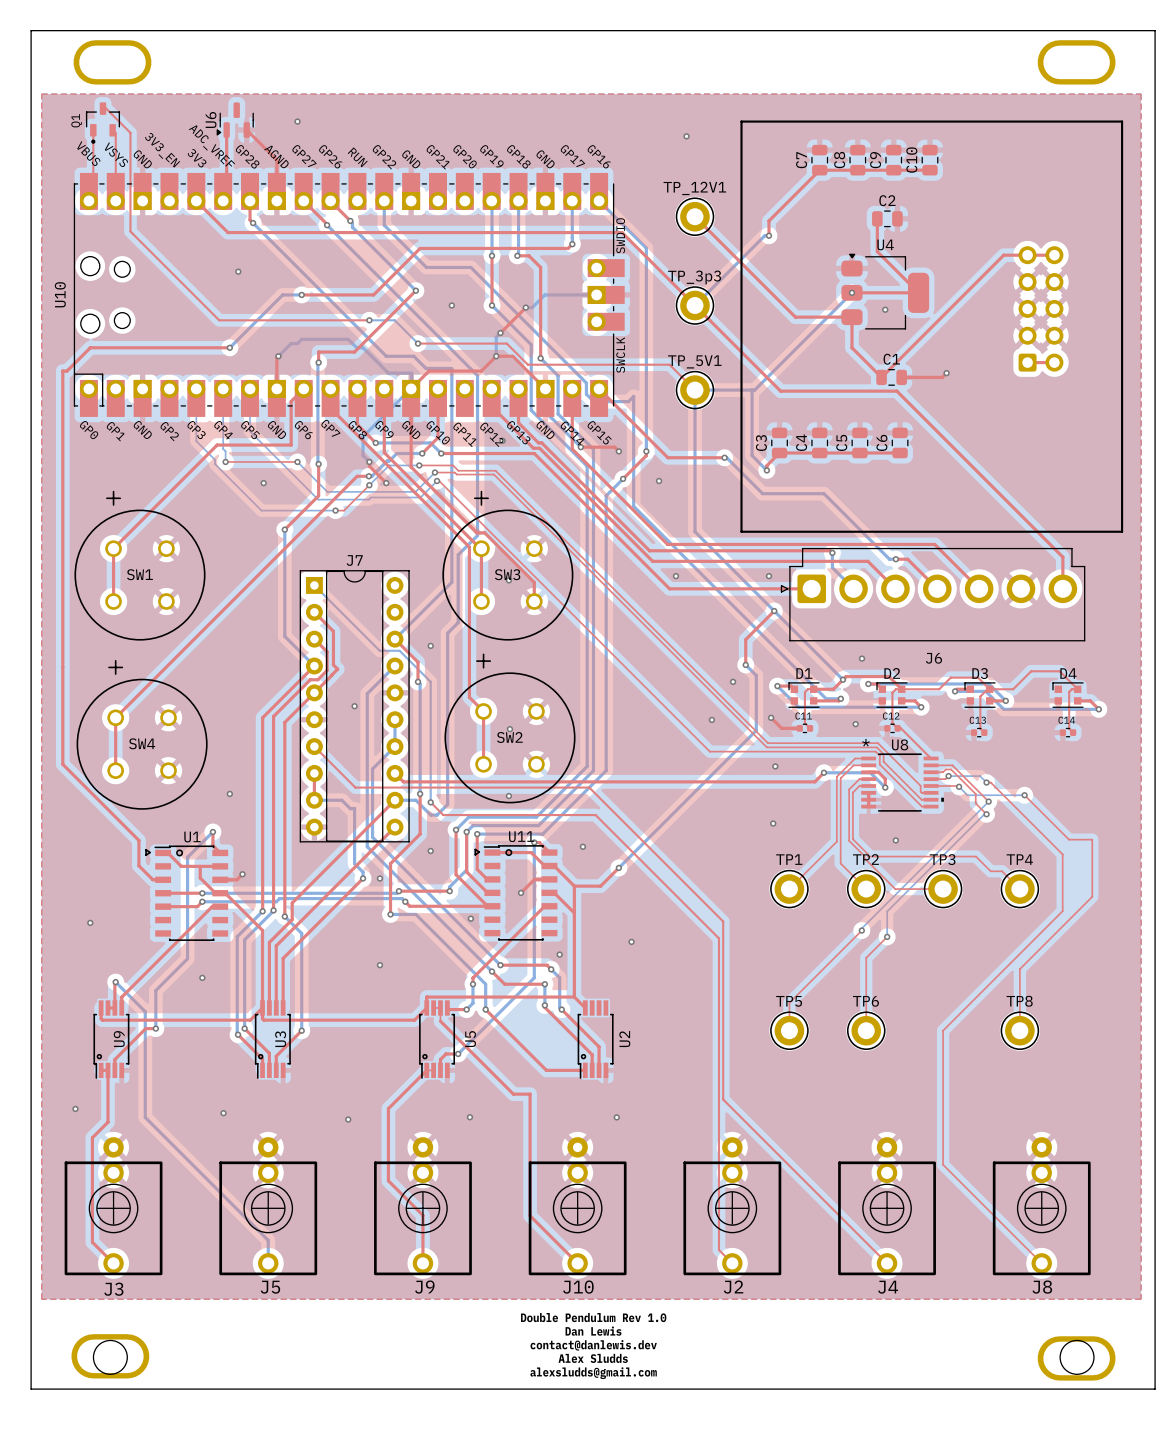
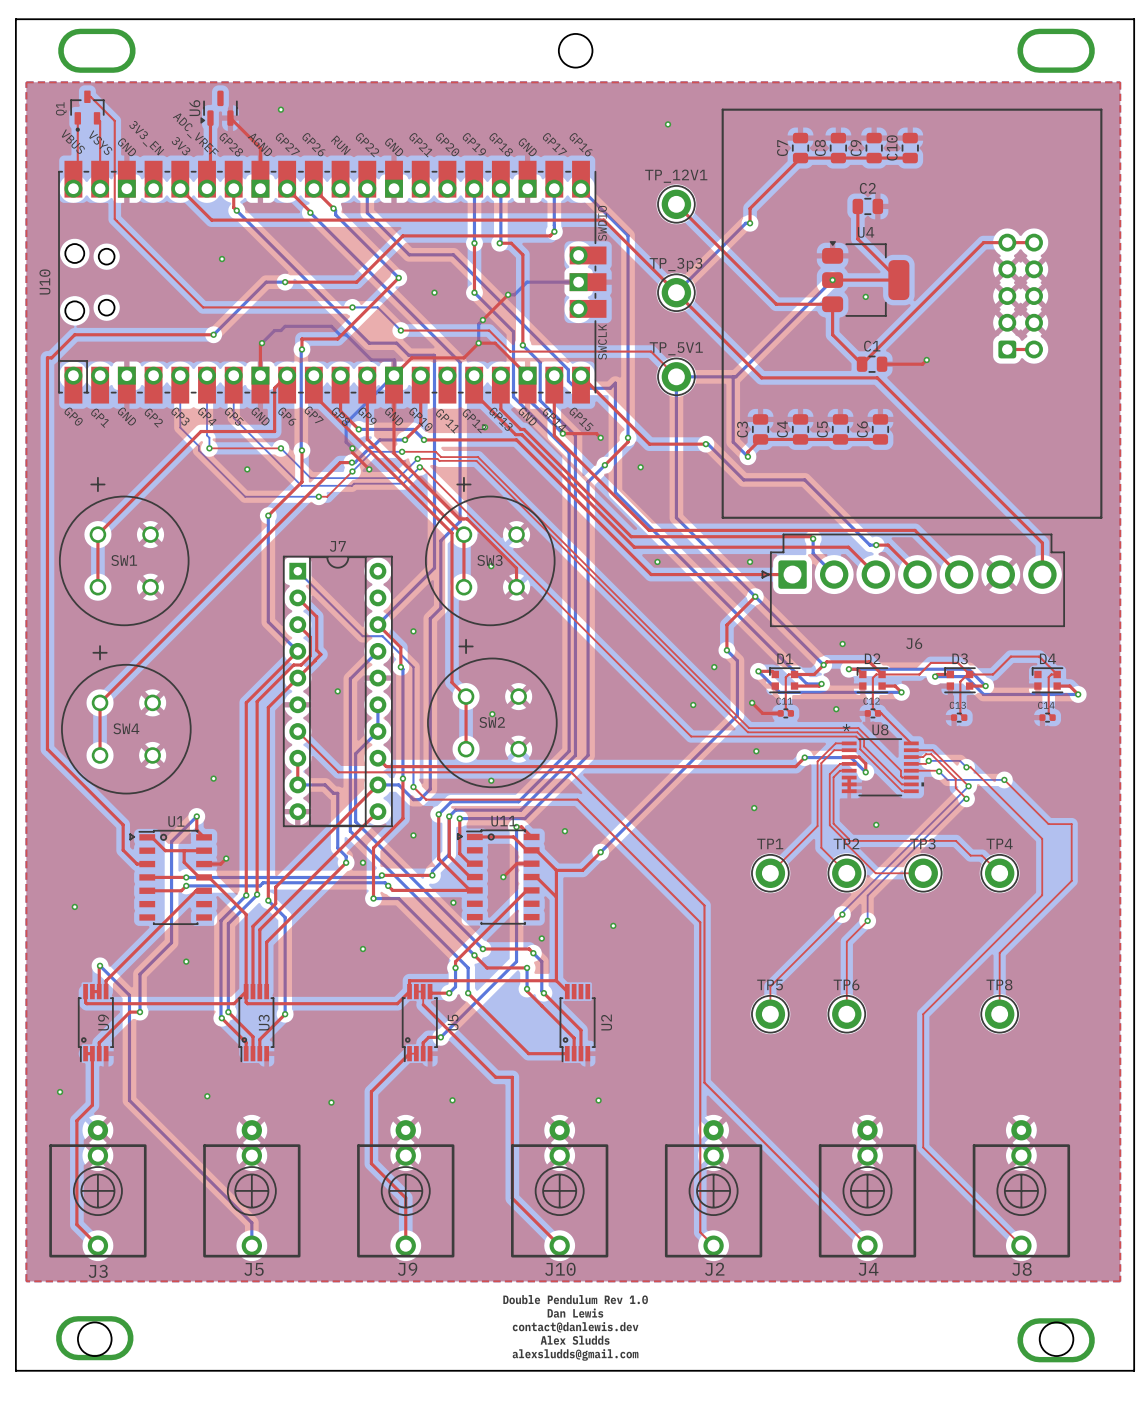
round board edge: none -> [558, 33, 593, 68]

